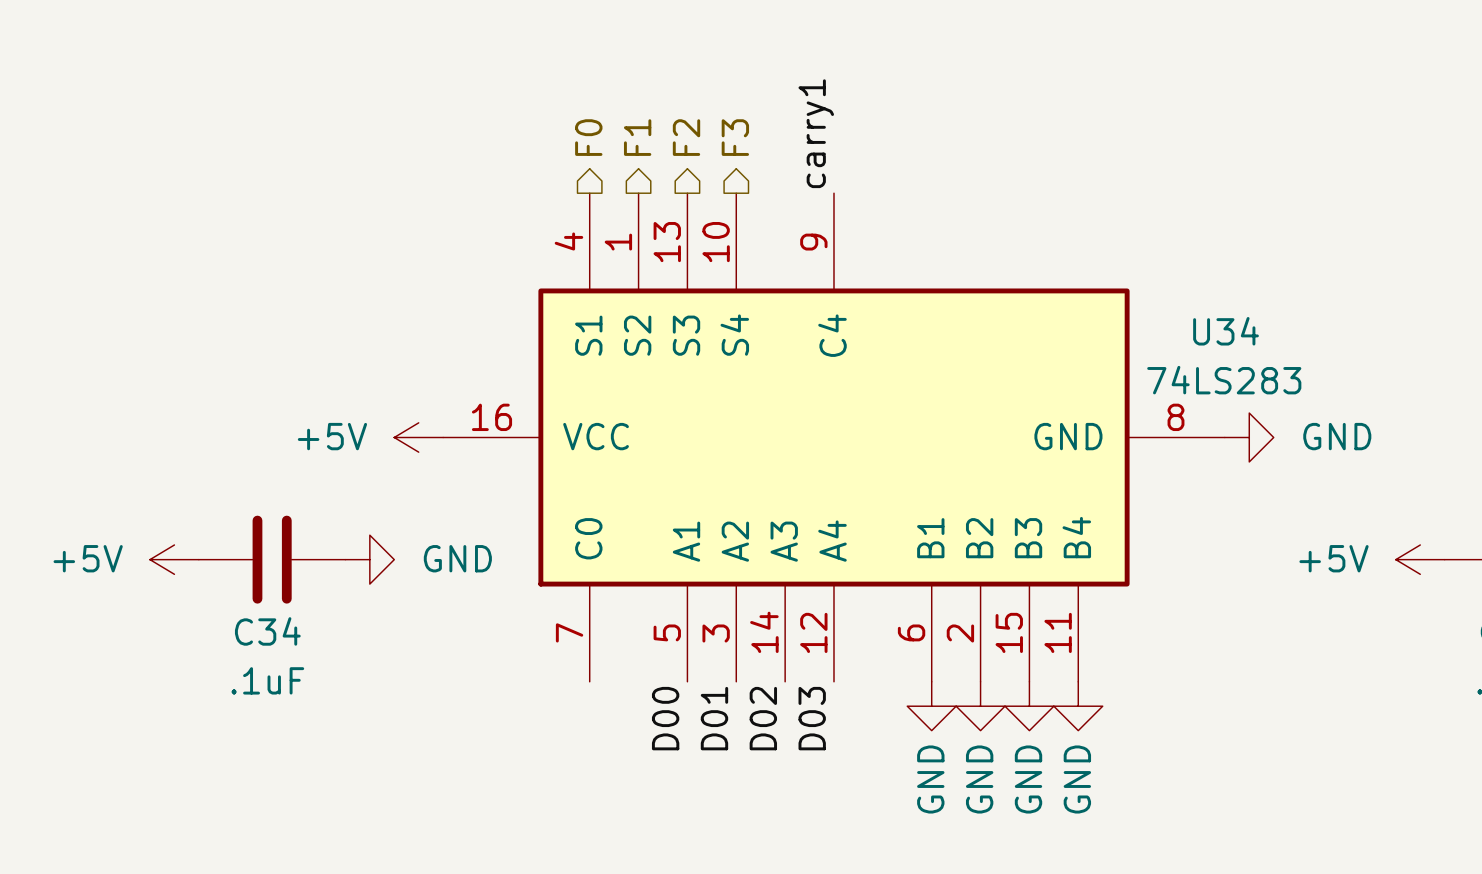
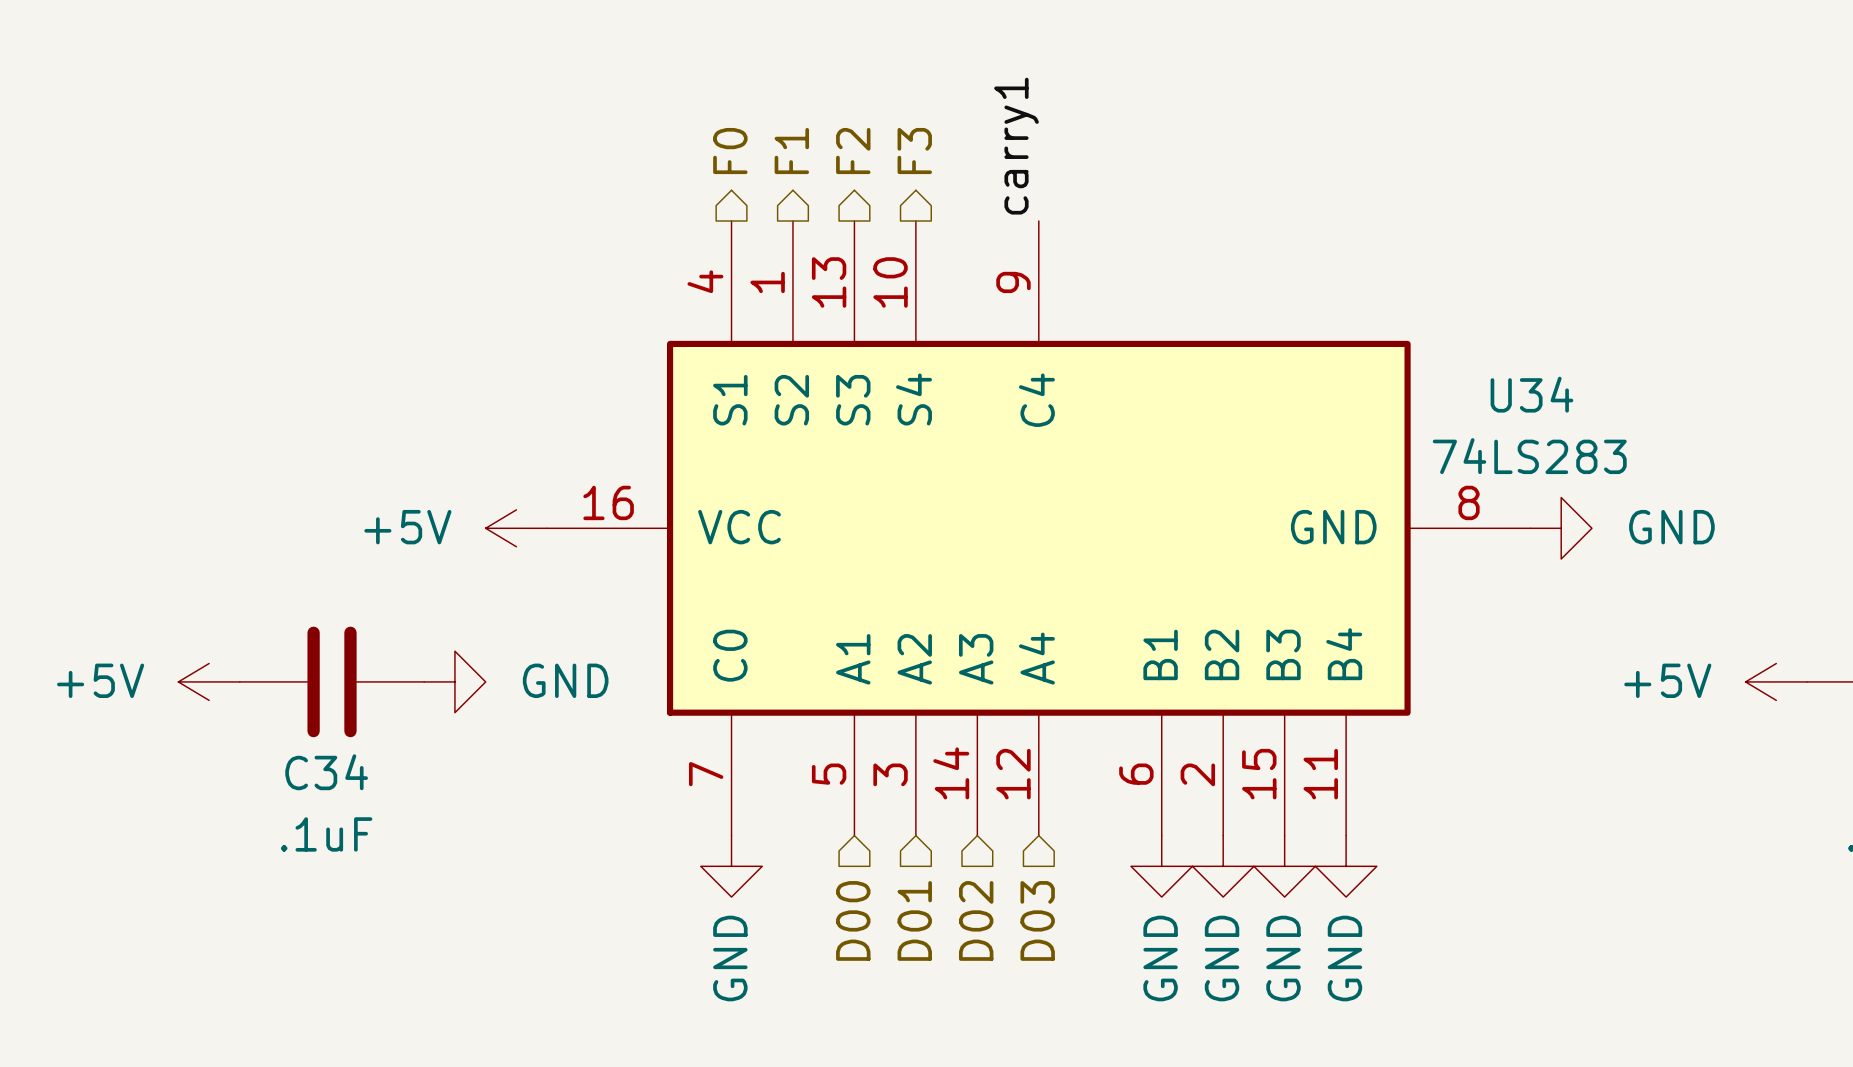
power symbol: none -> GND (731, 866)
label: D00 (665, 718) -> none
label: D01 (714, 718) -> none
label: D02 (763, 718) -> none
label: D03 (812, 718) -> none
hierarchical label: none -> D00 (853, 920)
hierarchical label: none -> D01 (914, 920)
hierarchical label: none -> D02 (976, 920)
hierarchical label: none -> D03 (1037, 920)

